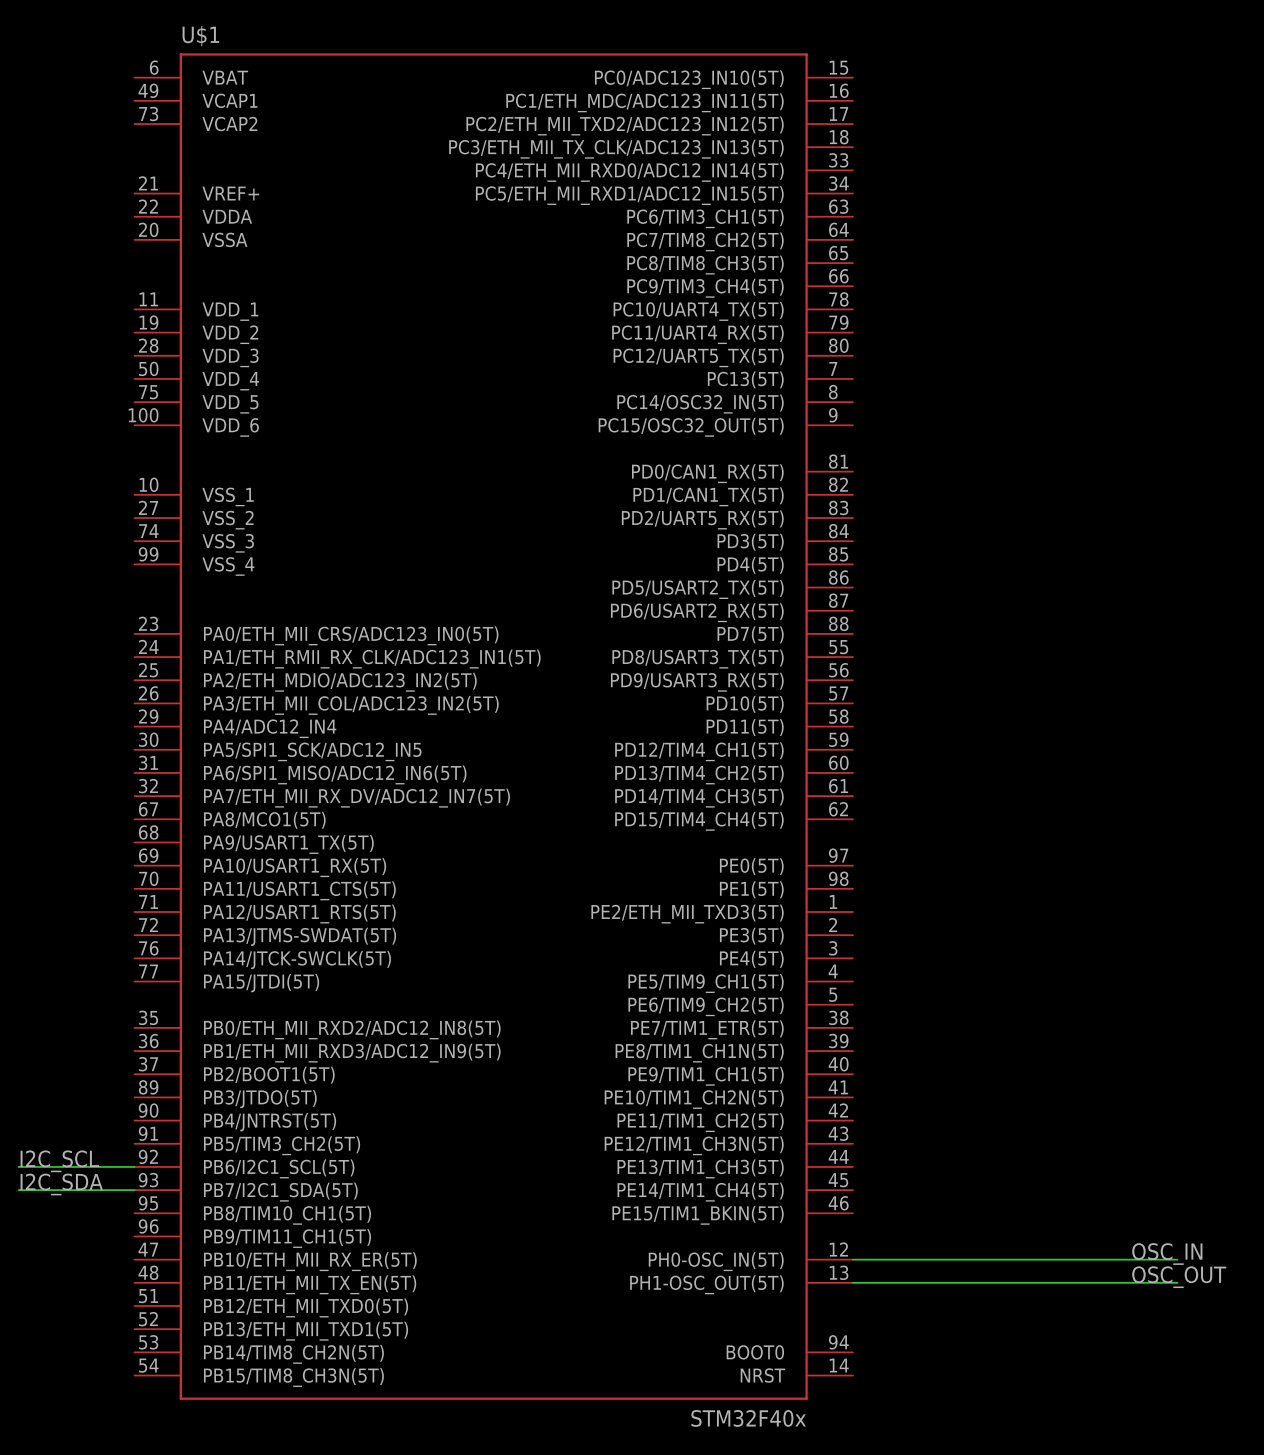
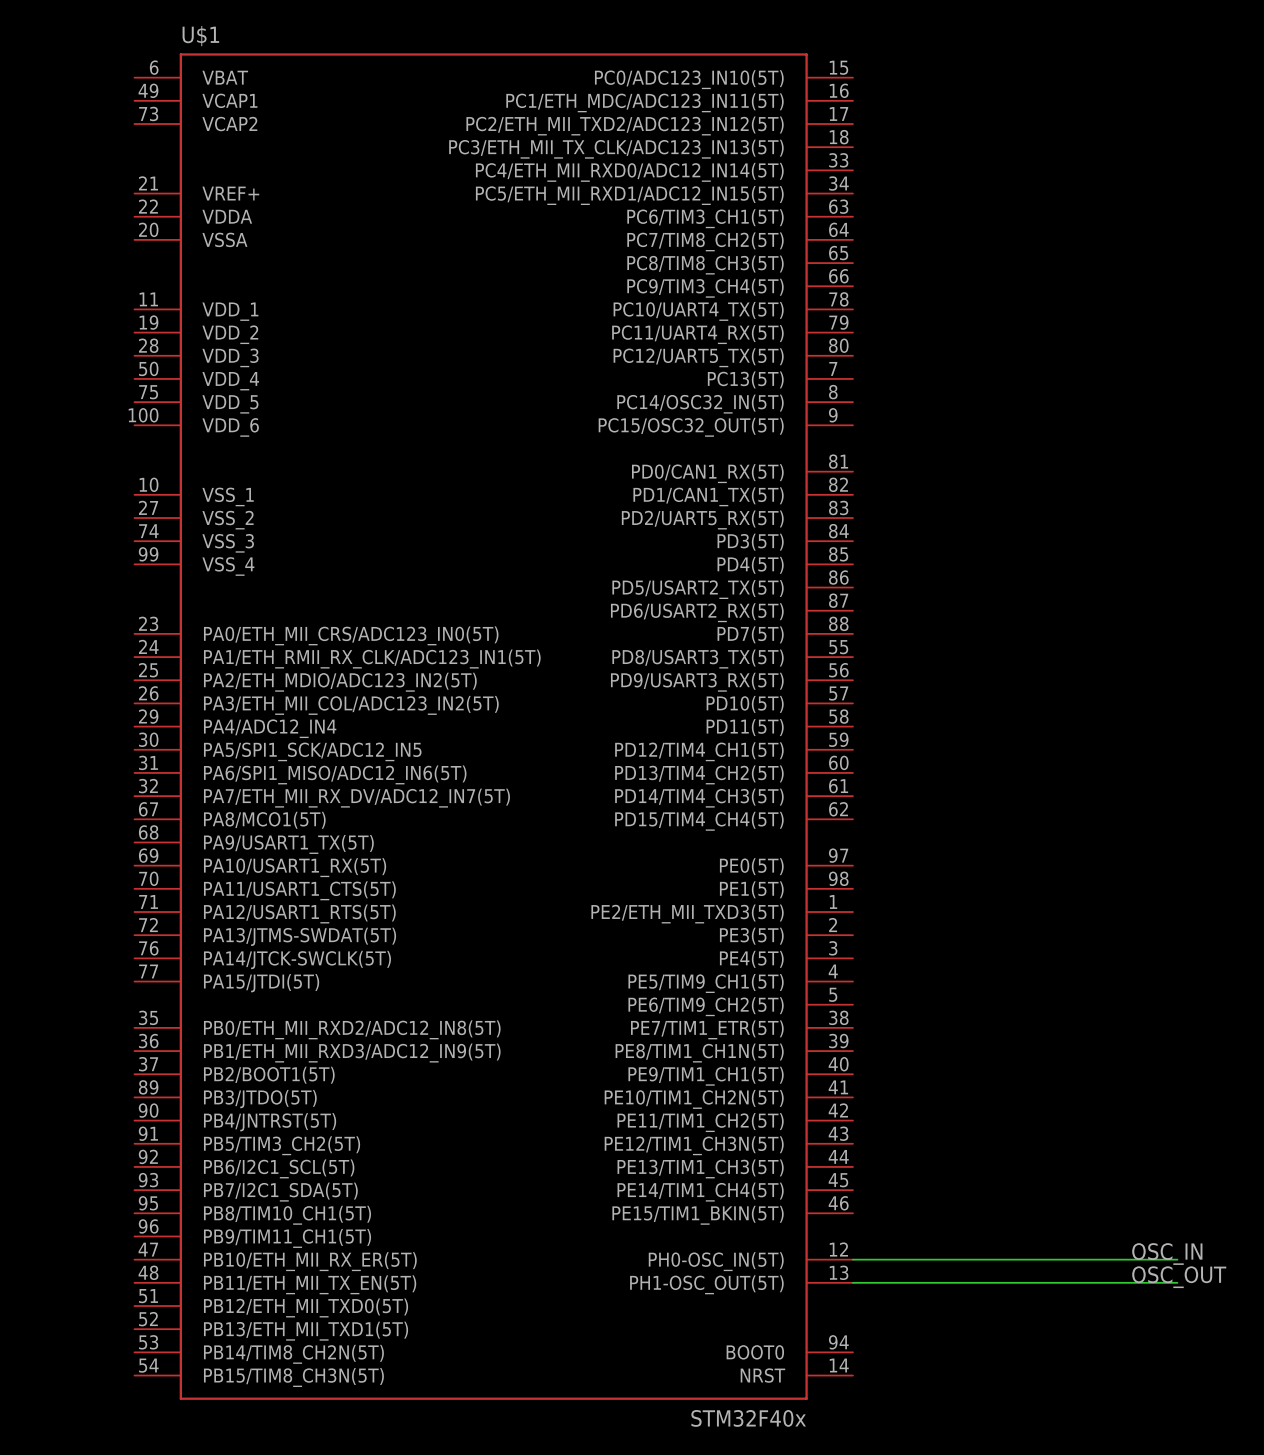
label: I2C_SCL (59, 1161) -> none
wire: (18, 1166) (134, 1166) -> none
label: I2C_SDA (61, 1184) -> none
wire: (18, 1190) (134, 1190) -> none

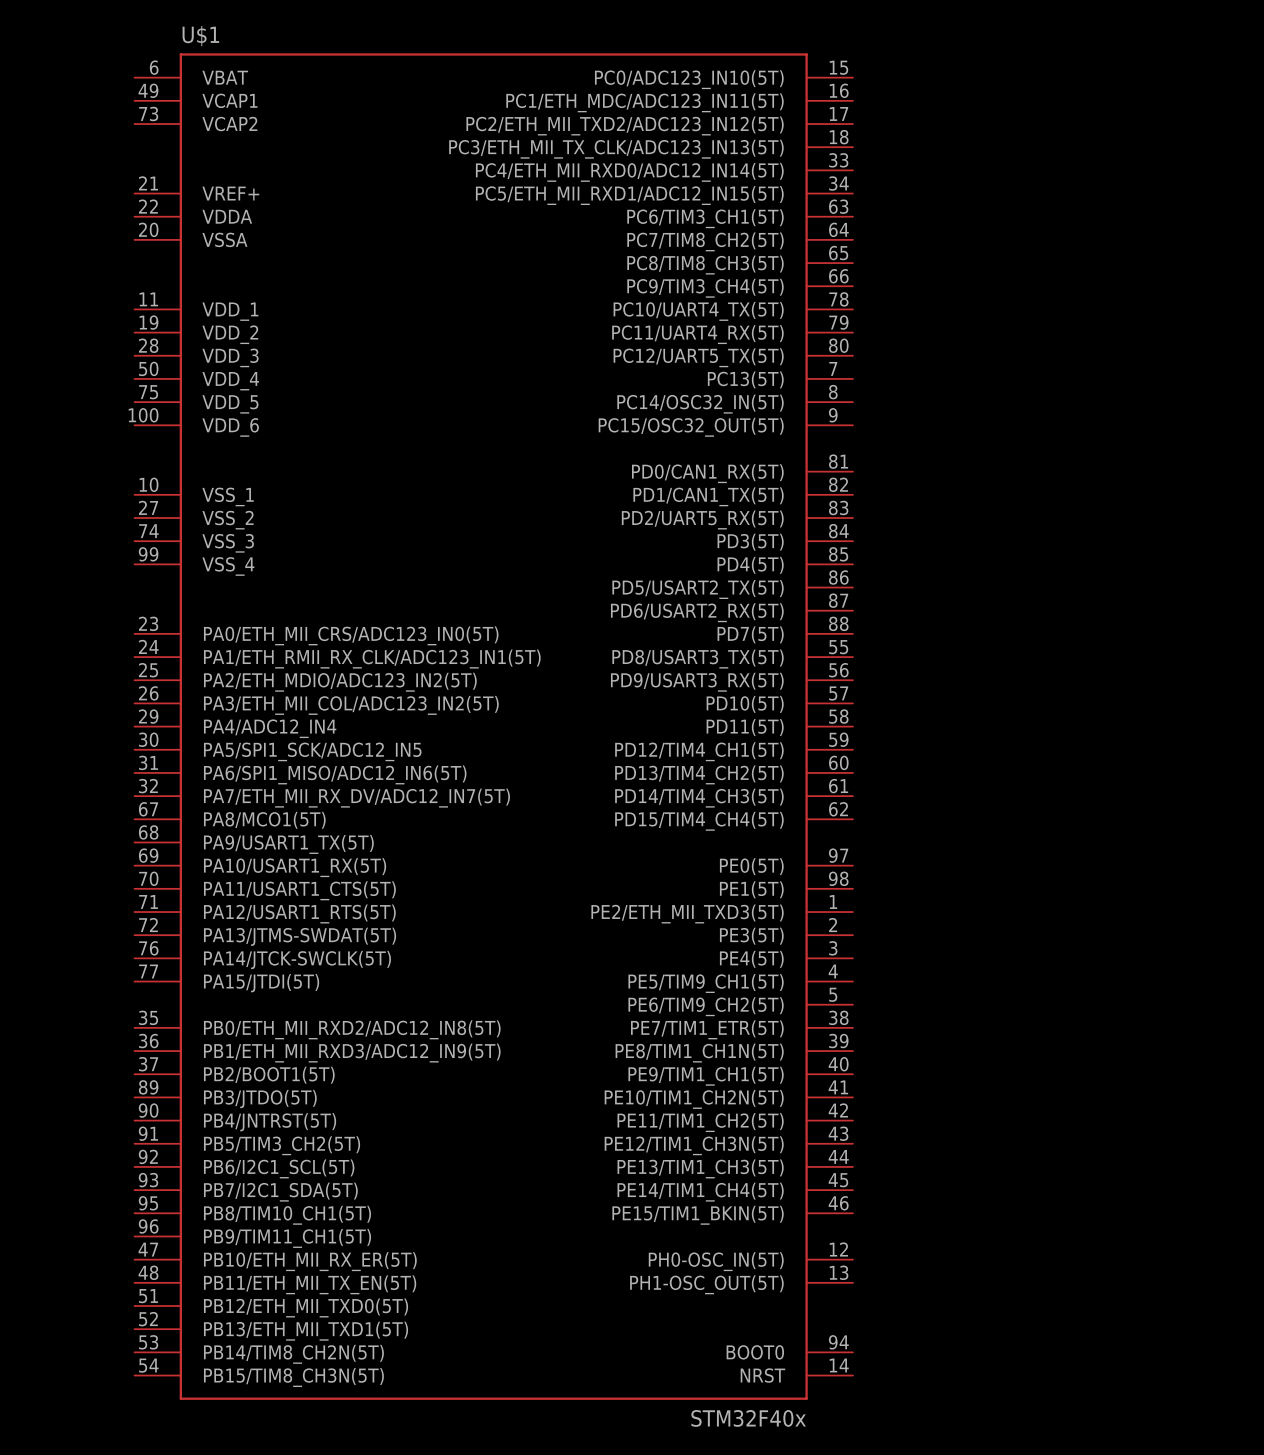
label: OSC_IN (1167, 1254) -> none
wire: (852, 1259) (1177, 1259) -> none
label: OSC_OUT (1179, 1277) -> none
wire: (852, 1282) (1177, 1282) -> none

